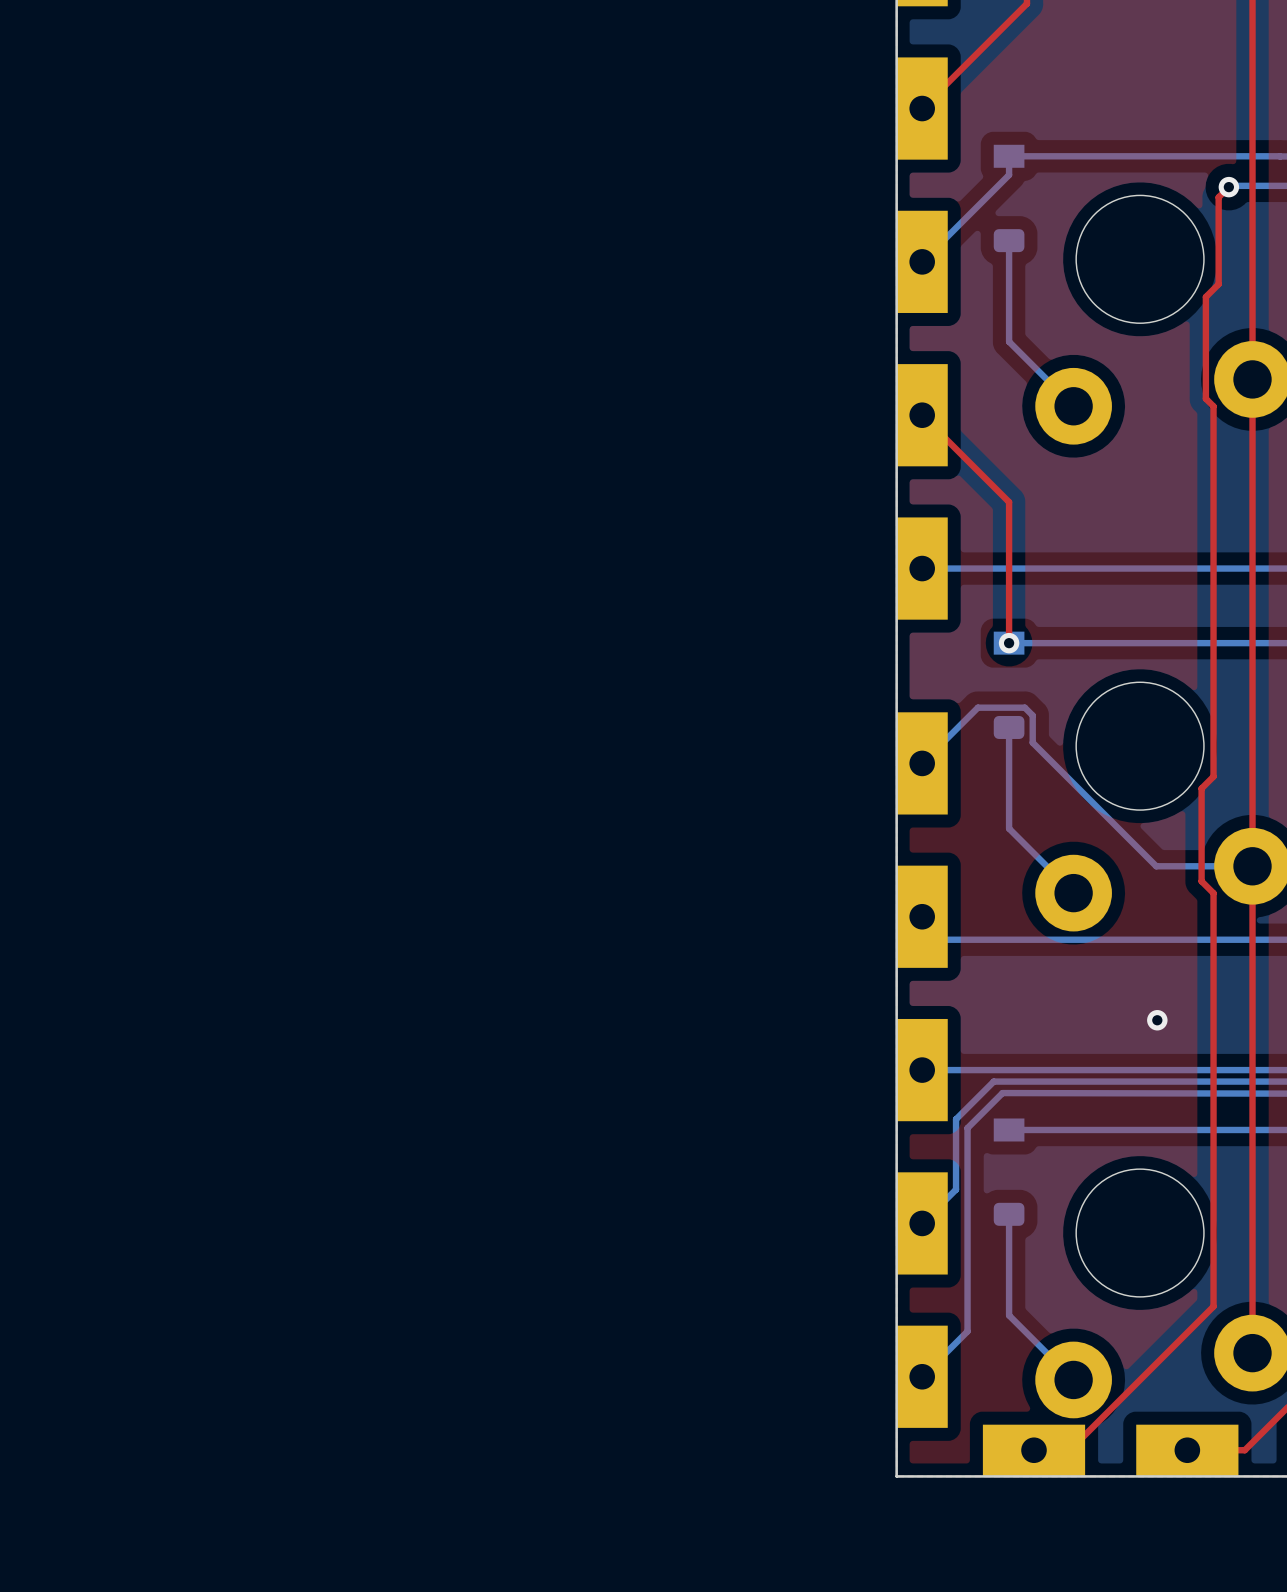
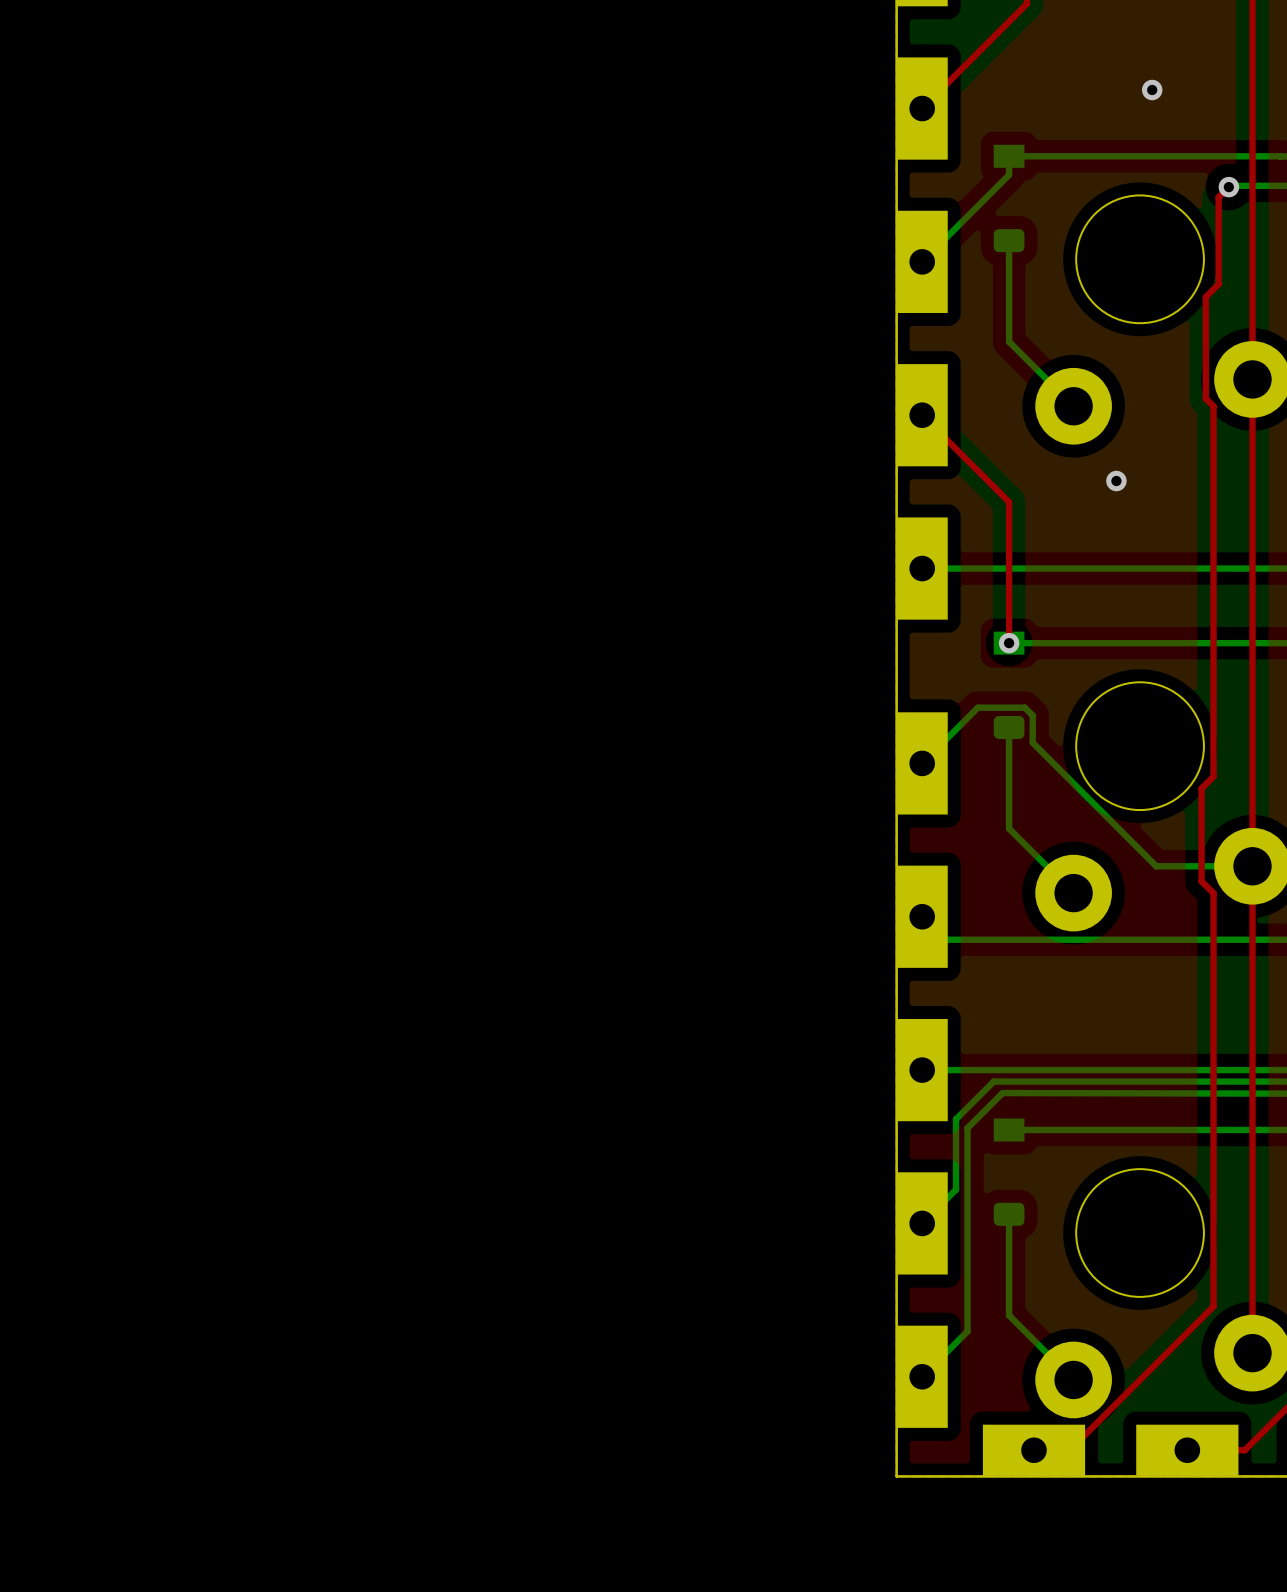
via: none -> (1152, 90)
via: none -> (1116, 481)
via: (1157, 1020) -> none

